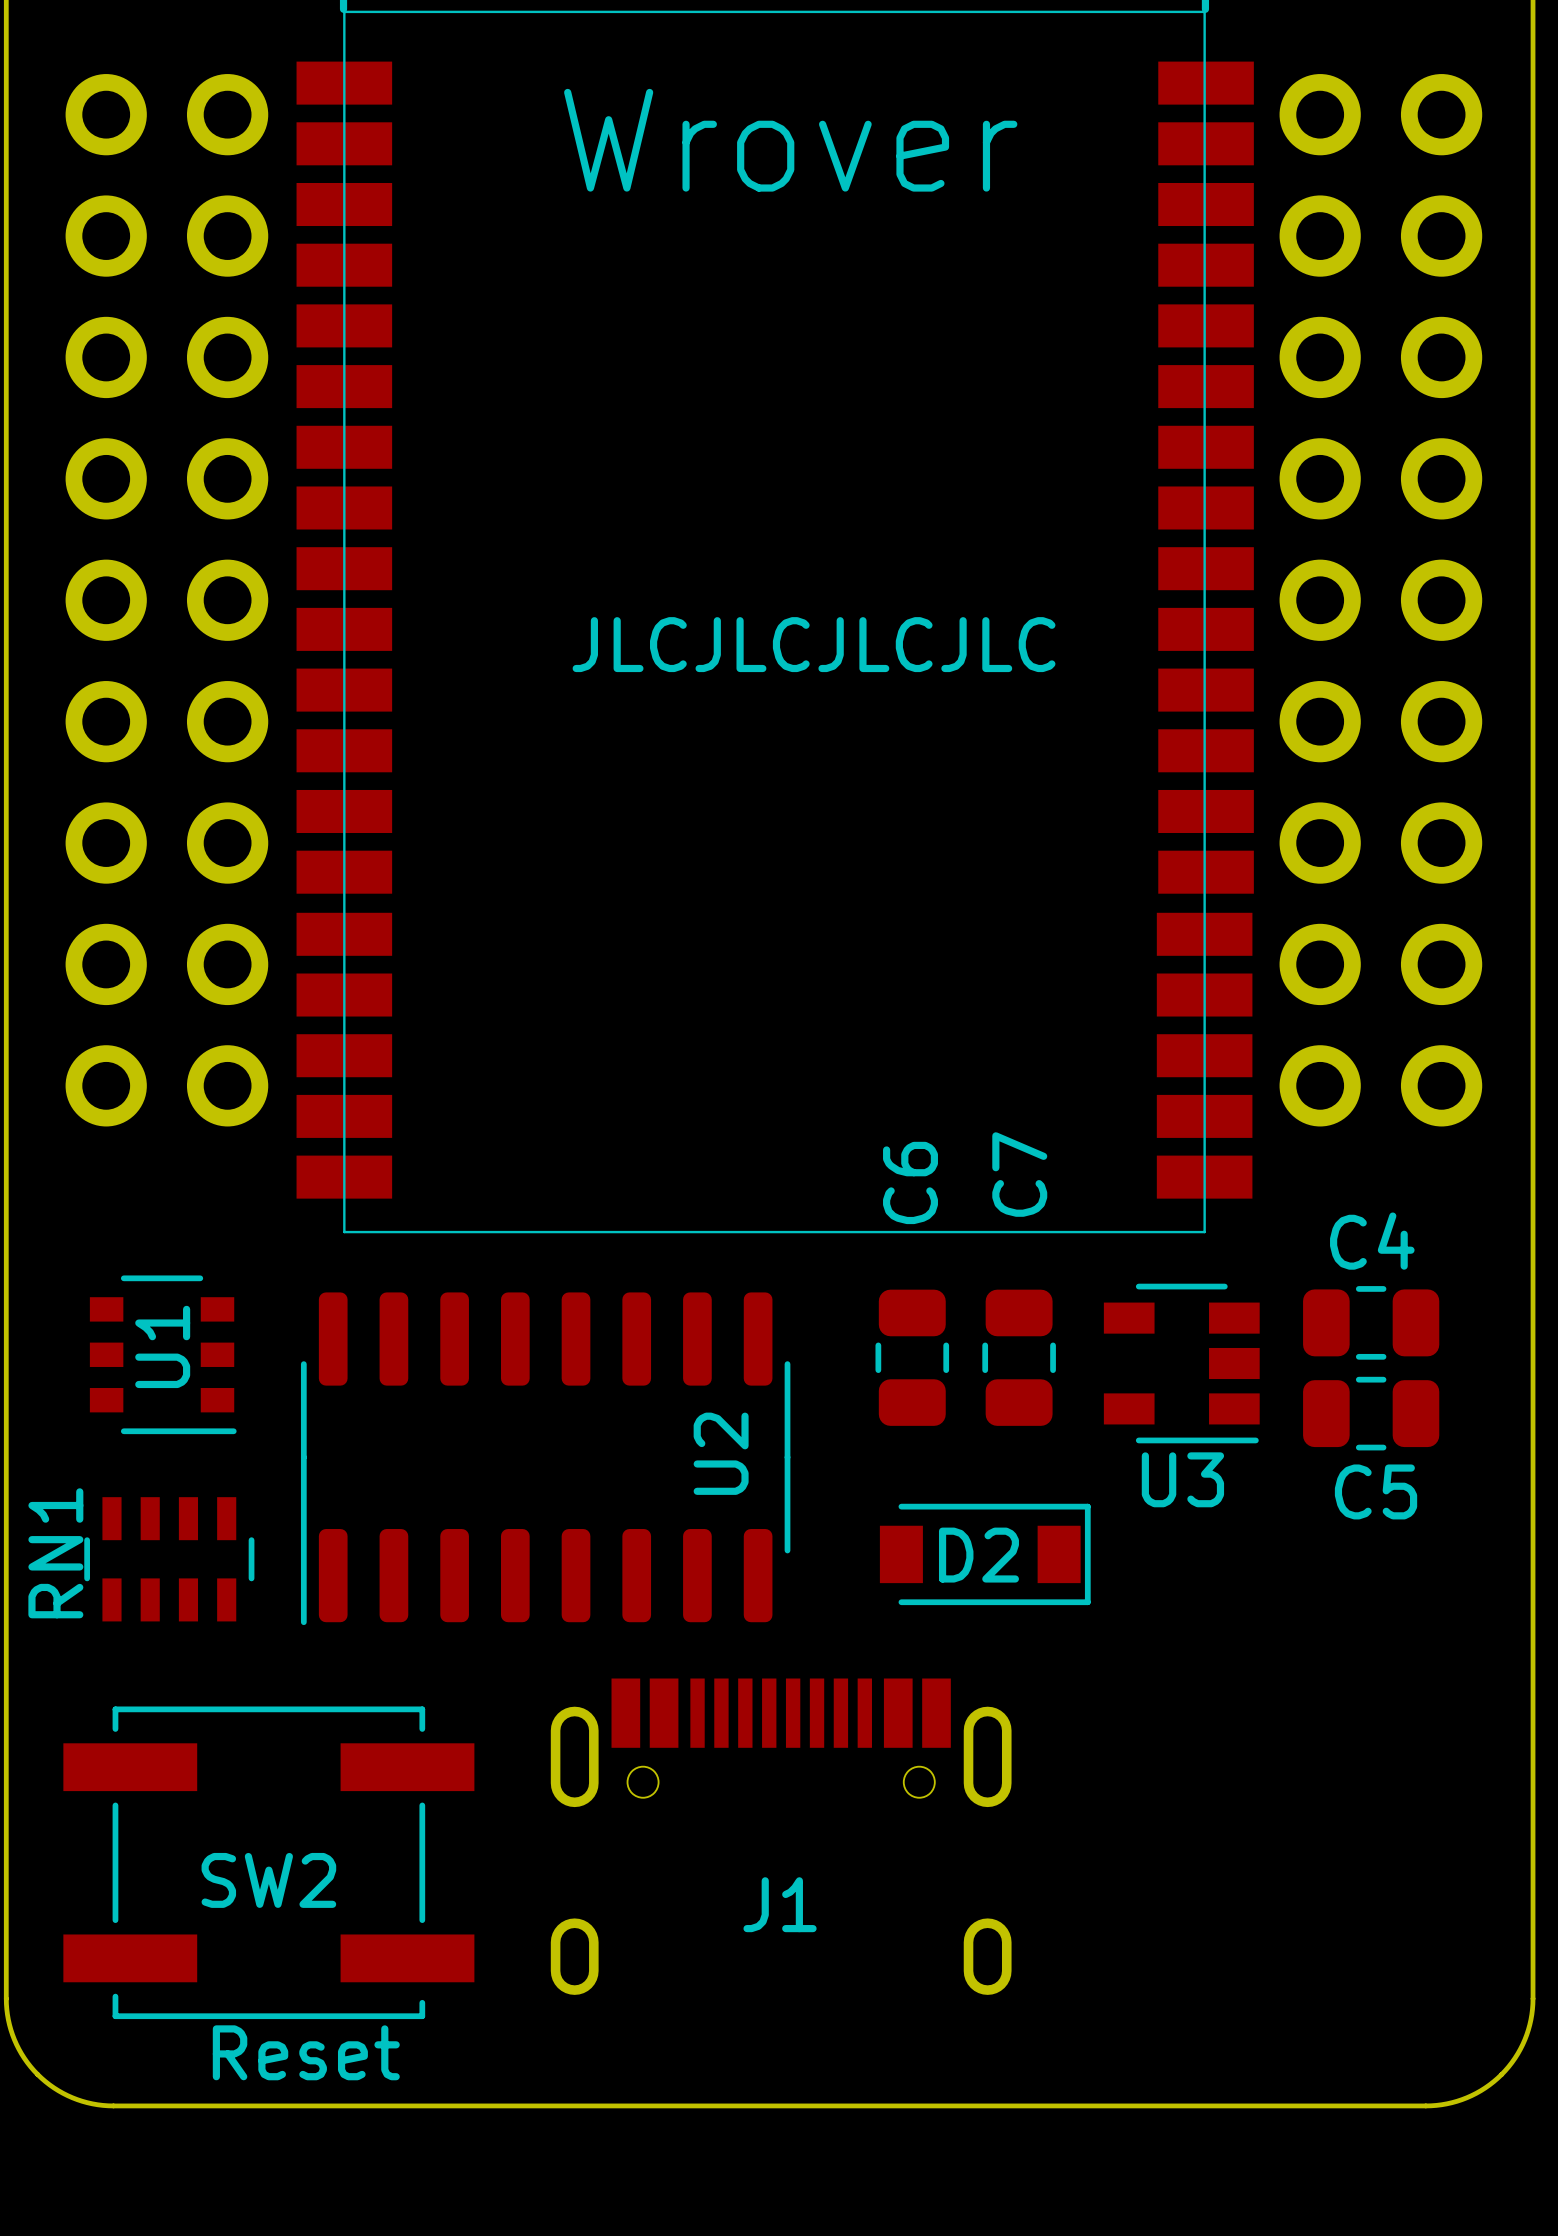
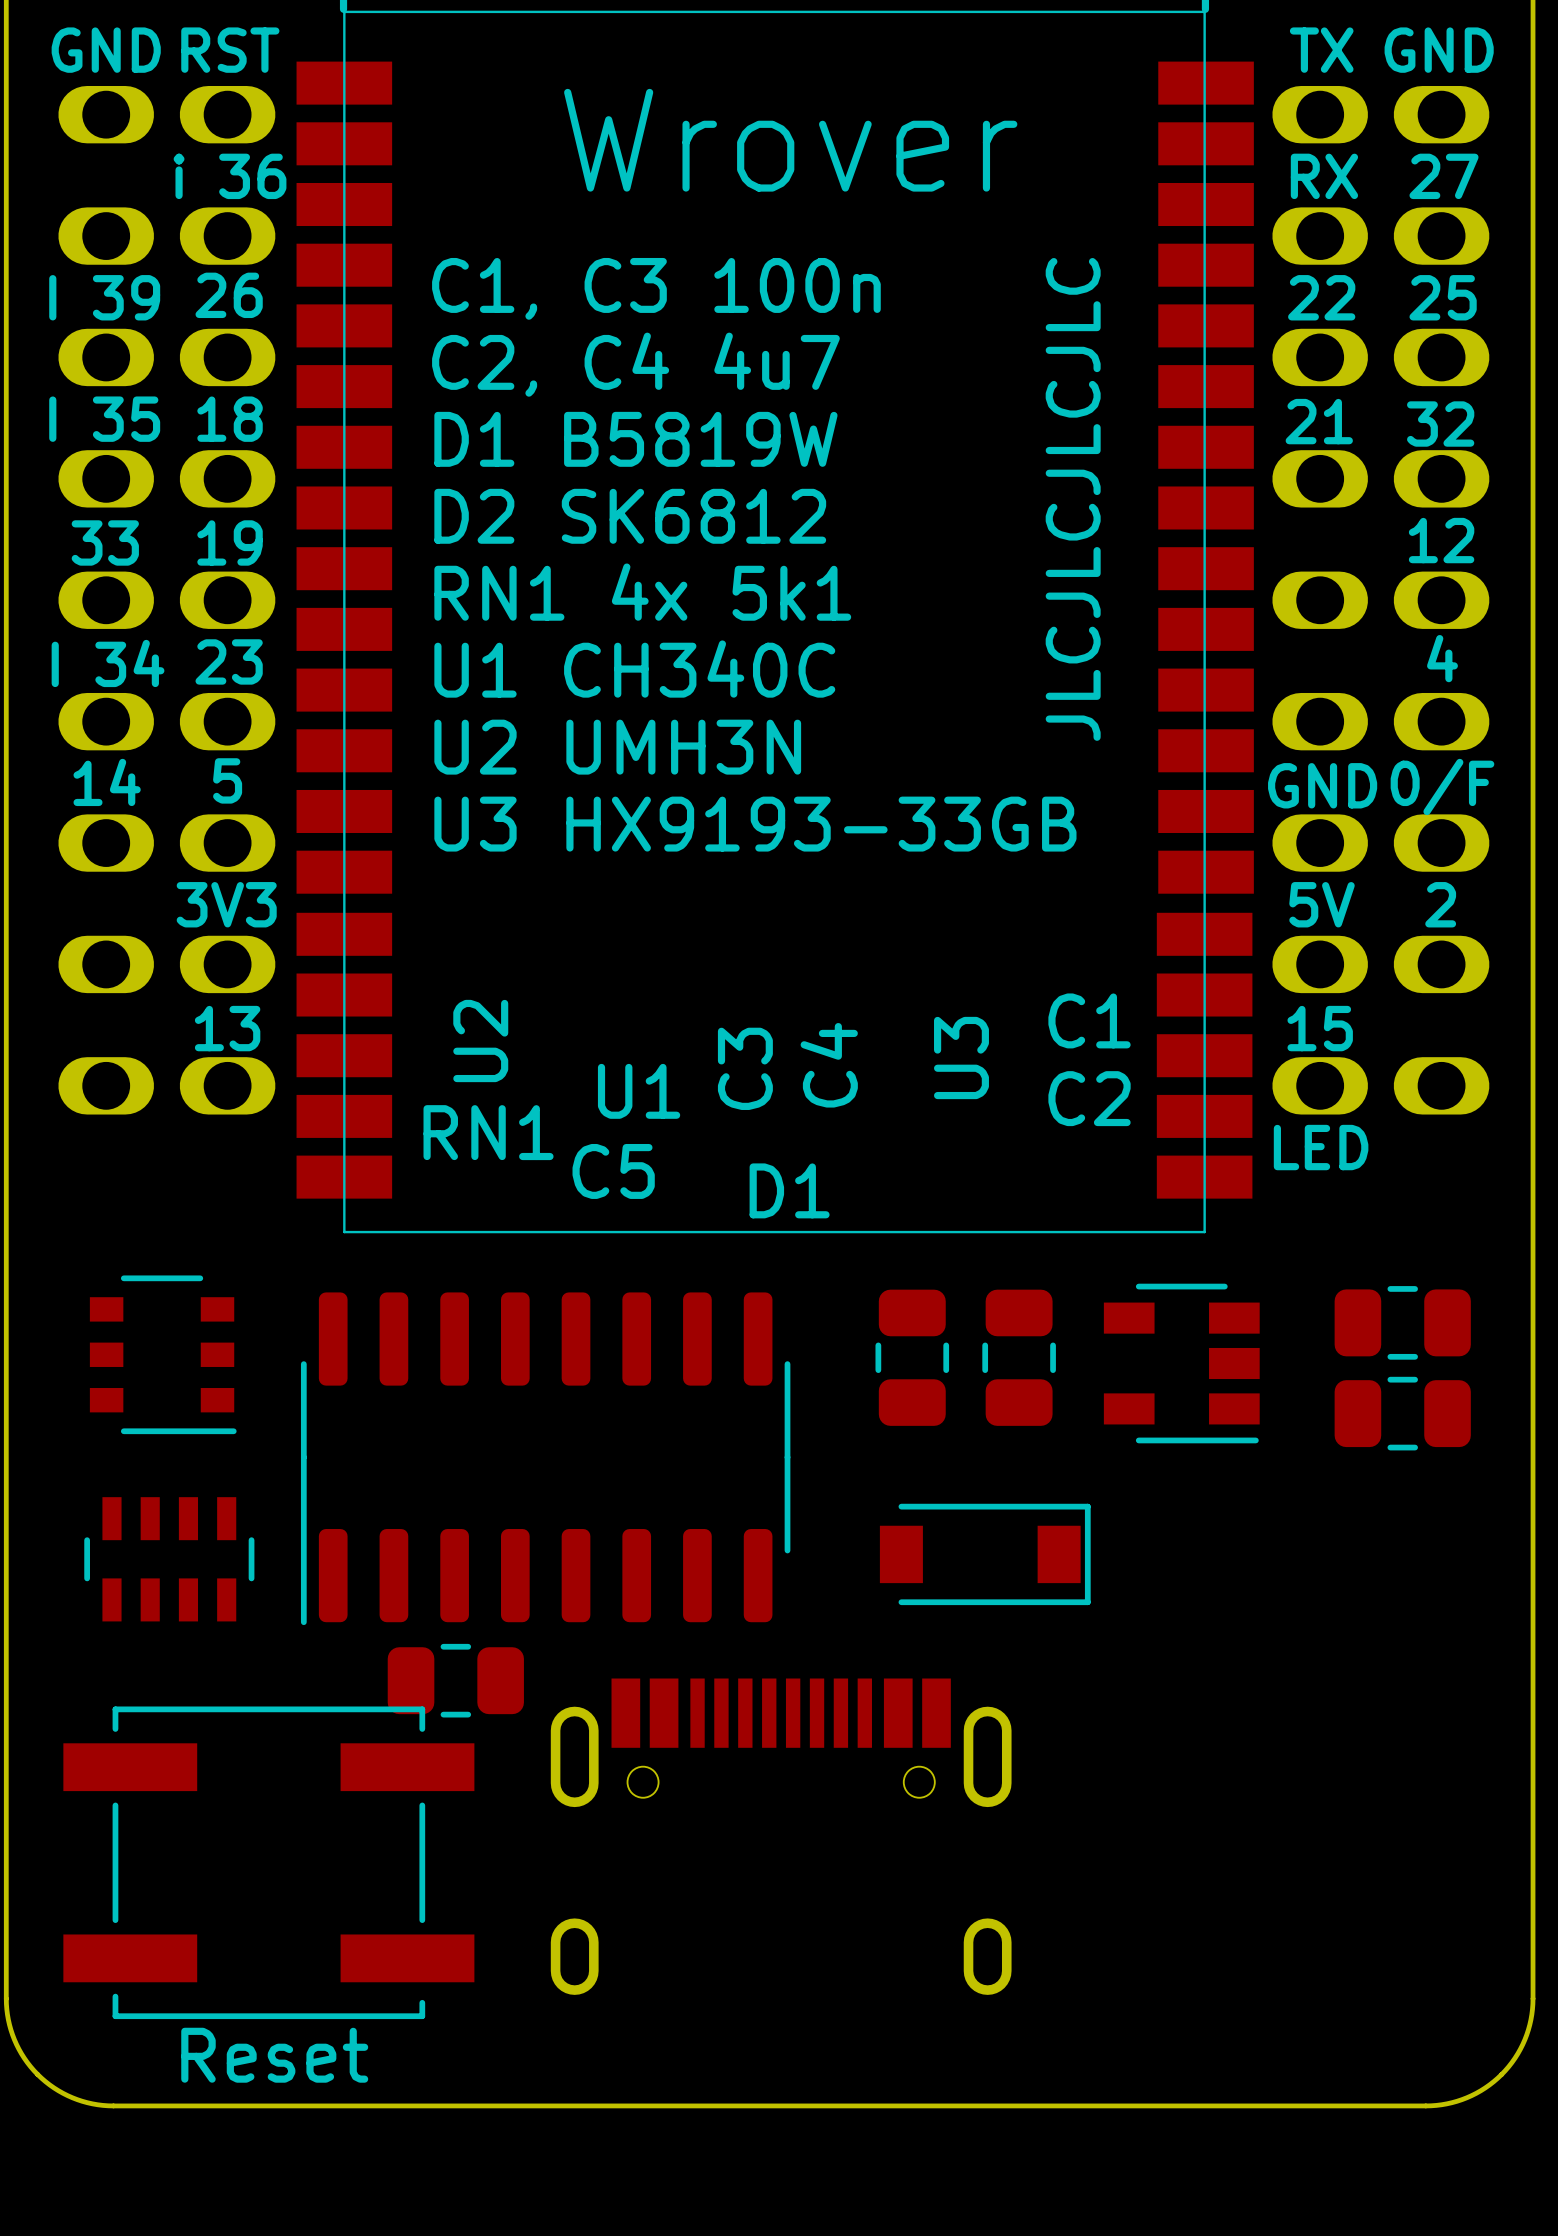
text: none -> GND (106, 50)
text: none -> RST (230, 50)
text: none -> TX (1321, 50)
text: none -> GND (1439, 50)
part footprint: [65, 74, 269, 1127] -> [58, 85, 276, 1115]
part footprint: [1279, 74, 1483, 1127] -> [1272, 85, 1490, 1115]
text: none -> i 36 (230, 176)
text: none -> RX (1324, 176)
text: none -> 27 (1444, 176)
text: none -> C1, C3 100n (656, 288)
text: none -> 26 (229, 295)
text: none -> I 39 (104, 297)
text: none -> 22 (1321, 297)
text: none -> 25 (1443, 297)
text: none -> C2, C4 4u7 (635, 364)
text: none -> I 35 (104, 419)
text: none -> 18 (230, 419)
text: none -> 21 (1319, 421)
text: none -> 32 (1440, 424)
text: none -> D1 B5819W (635, 439)
text: none -> D2 SK6812 (630, 516)
text: none -> 12 (1441, 540)
text: none -> 33 (105, 542)
text: none -> 19 (230, 542)
text: none -> RN1 4x 5k1 (642, 592)
text rotation: 0° (814, 644) -> 90° counterclockwise (1073, 499)
text: none -> 4 (1442, 658)
text: none -> 23 (229, 661)
text: none -> I 34 (108, 663)
text: none -> U1 CH340C (634, 669)
text: none -> U2 UMH3N (617, 747)
text: none -> 5 (227, 780)
text: none -> 14 (107, 782)
text: none -> GND (1322, 785)
text: none -> 0/F (1442, 786)
text: none -> U3 HX9193-33GB (755, 824)
text: none -> 3V3 (226, 904)
text: none -> 5V (1322, 904)
text: none -> 2 (1440, 904)
text: none -> 13 (227, 1028)
text: none -> 15 (1320, 1028)
text: none -> LED (1321, 1147)
C7 name: C7 (1019, 1174) -> C4 (829, 1065)
C6 name: C6 (910, 1182) -> C3 (745, 1068)
C4 name: C4 (1372, 1241) -> C1 (1089, 1020)
C4 position: (1371, 1322) -> (1402, 1322)
U1 name: U1 (162, 1346) -> U2 (480, 1041)
C5 position: (1371, 1413) -> (455, 1680)
C2: none -> (1402, 1413)
U2 name: U2 (721, 1453) -> U1 (639, 1091)
U3 name rotation: 0° (1182, 1479) -> 90° counterclockwise (961, 1058)
U3 name position: U3 (1182, 1479) -> U3 (961, 1058)
C5 name position: C5 (1376, 1491) -> C5 (613, 1171)
RN1 name rotation: 0° (55, 1553) -> 90° clockwise (488, 1132)
RN1 name position: RN1 (55, 1553) -> RN1 (488, 1132)
D2 name: D2 (978, 1555) -> D1 (789, 1190)
SW2 name: SW2 (268, 1880) -> none
J1 name: J1 (780, 1904) -> none
text position: Reset (306, 2052) -> Reset (274, 2055)

